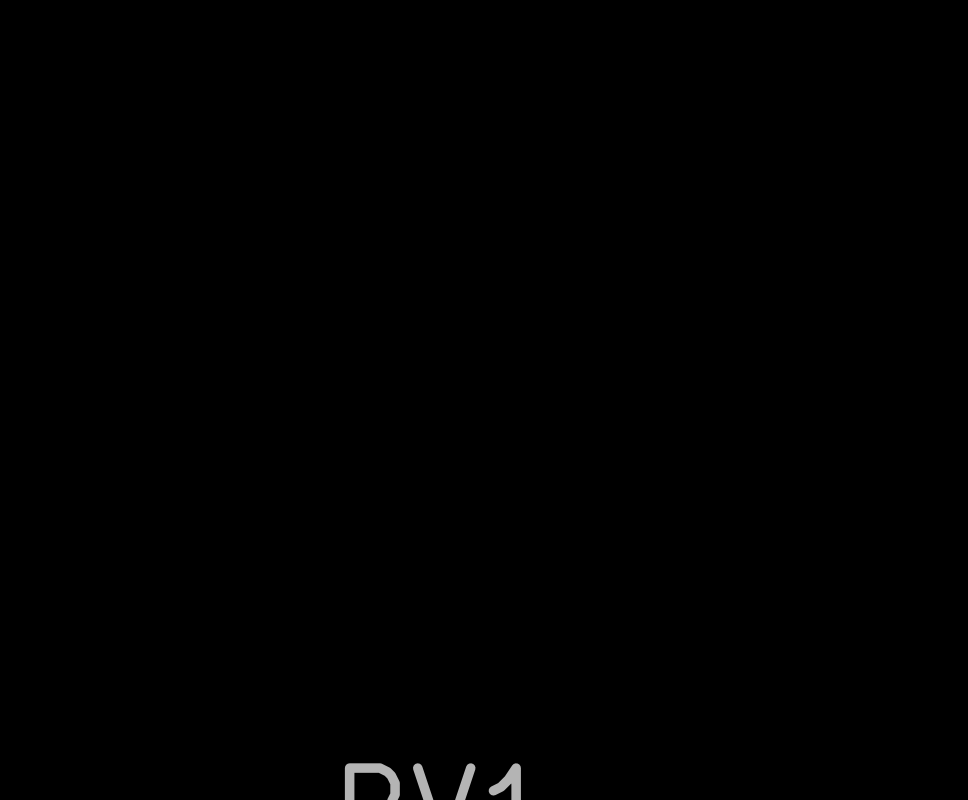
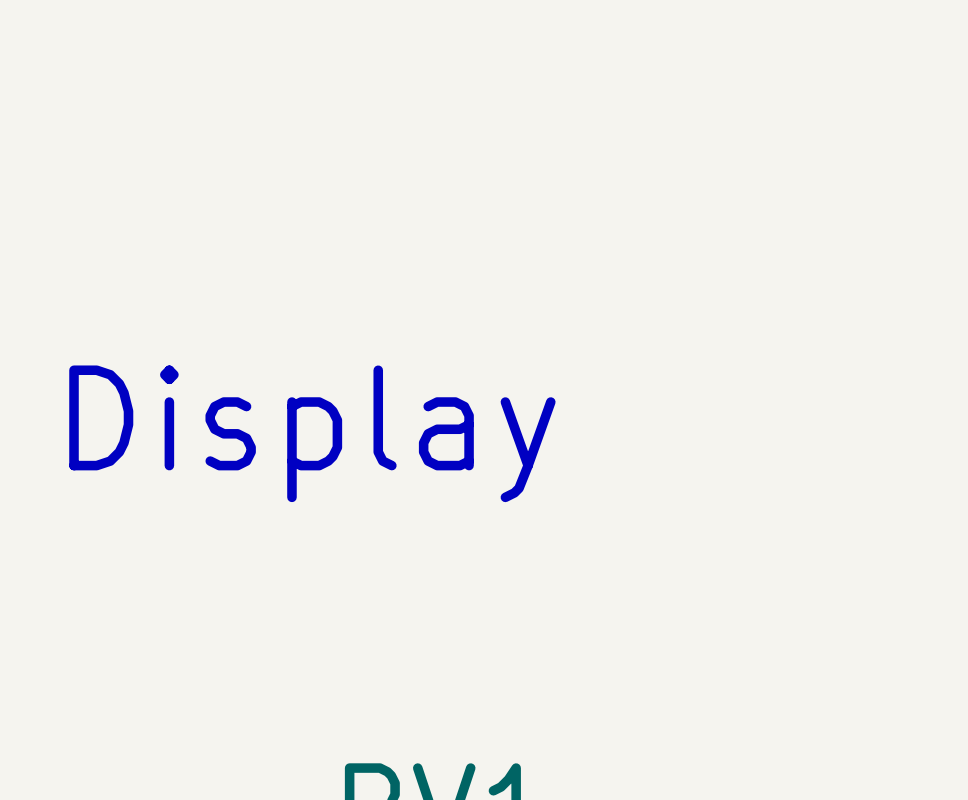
text: none -> Display (312, 433)

